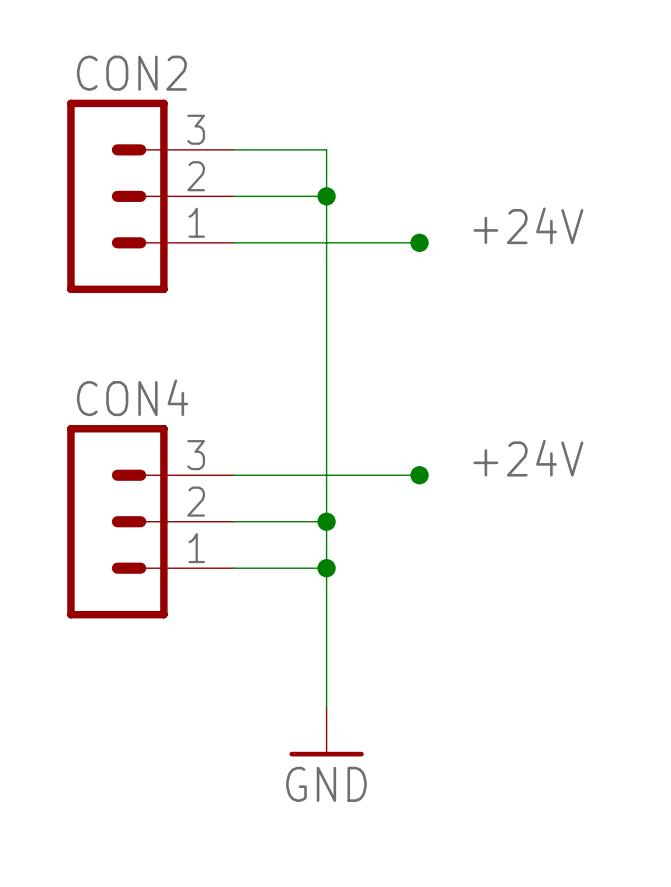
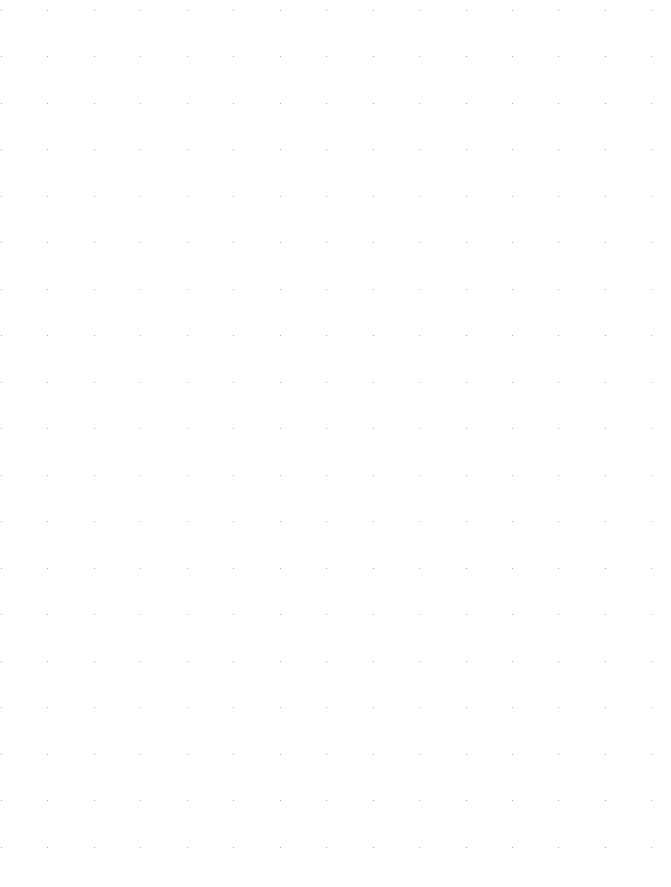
wire: (233, 149) (326, 149) (326, 707) -> none
CON2: (150, 196) -> none
wire: (233, 196) (326, 196) -> none
junction: (326, 196) -> none
label: +24V (528, 225) -> none
wire: (233, 242) (419, 242) -> none
junction: (419, 242) -> none
label: +24V (528, 458) -> none
wire: (233, 475) (419, 475) -> none
junction: (419, 475) -> none
CON4: (150, 521) -> none
wire: (233, 521) (326, 521) -> none
junction: (326, 521) -> none
wire: (233, 568) (326, 568) -> none
junction: (326, 568) -> none
power symbol: GND (326, 732) -> none

